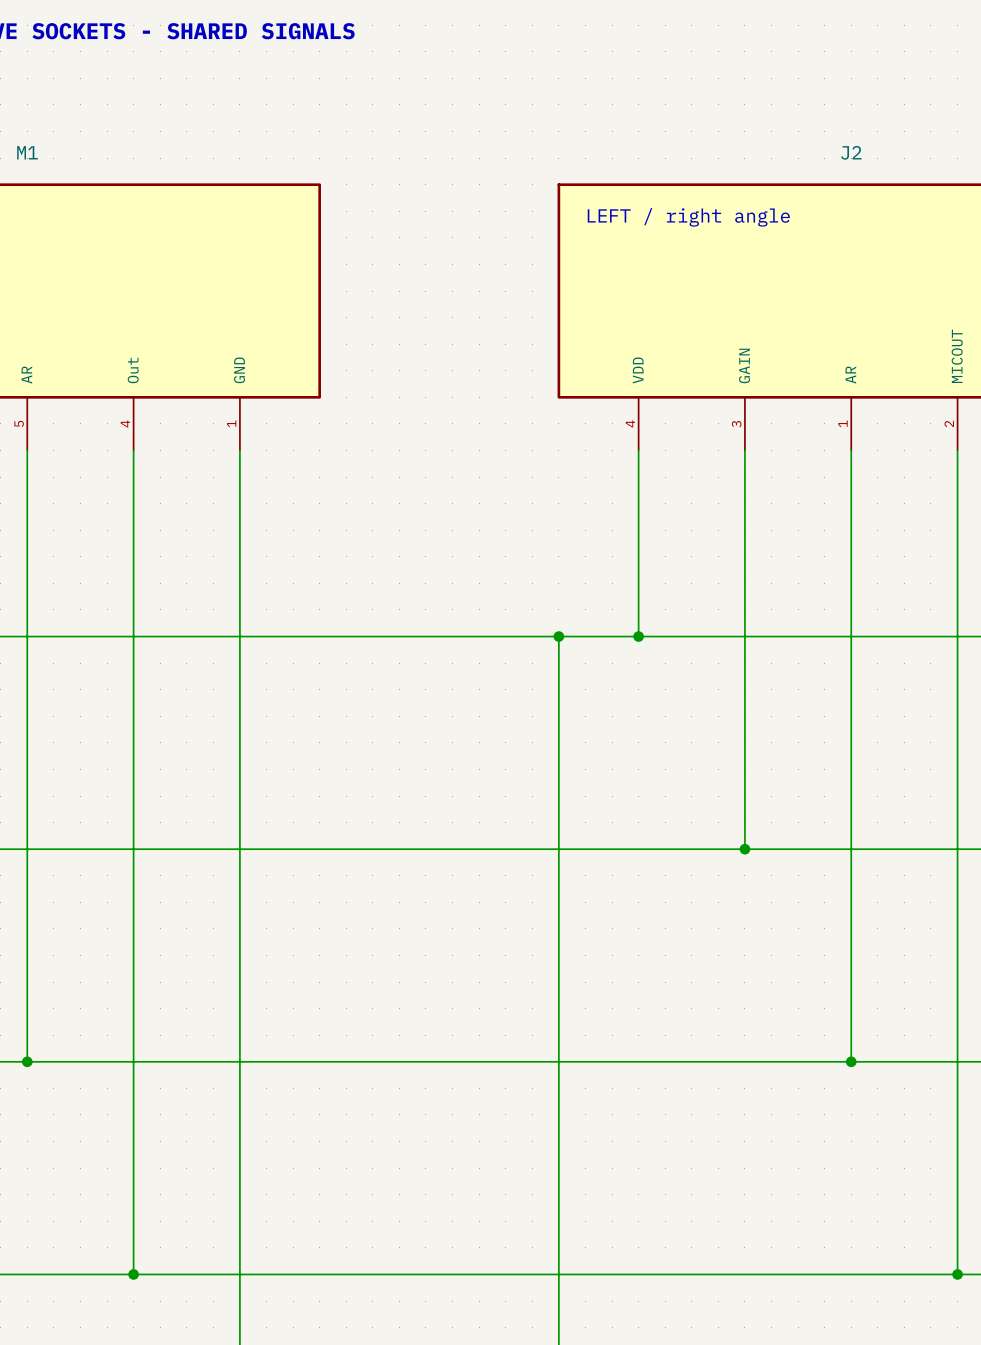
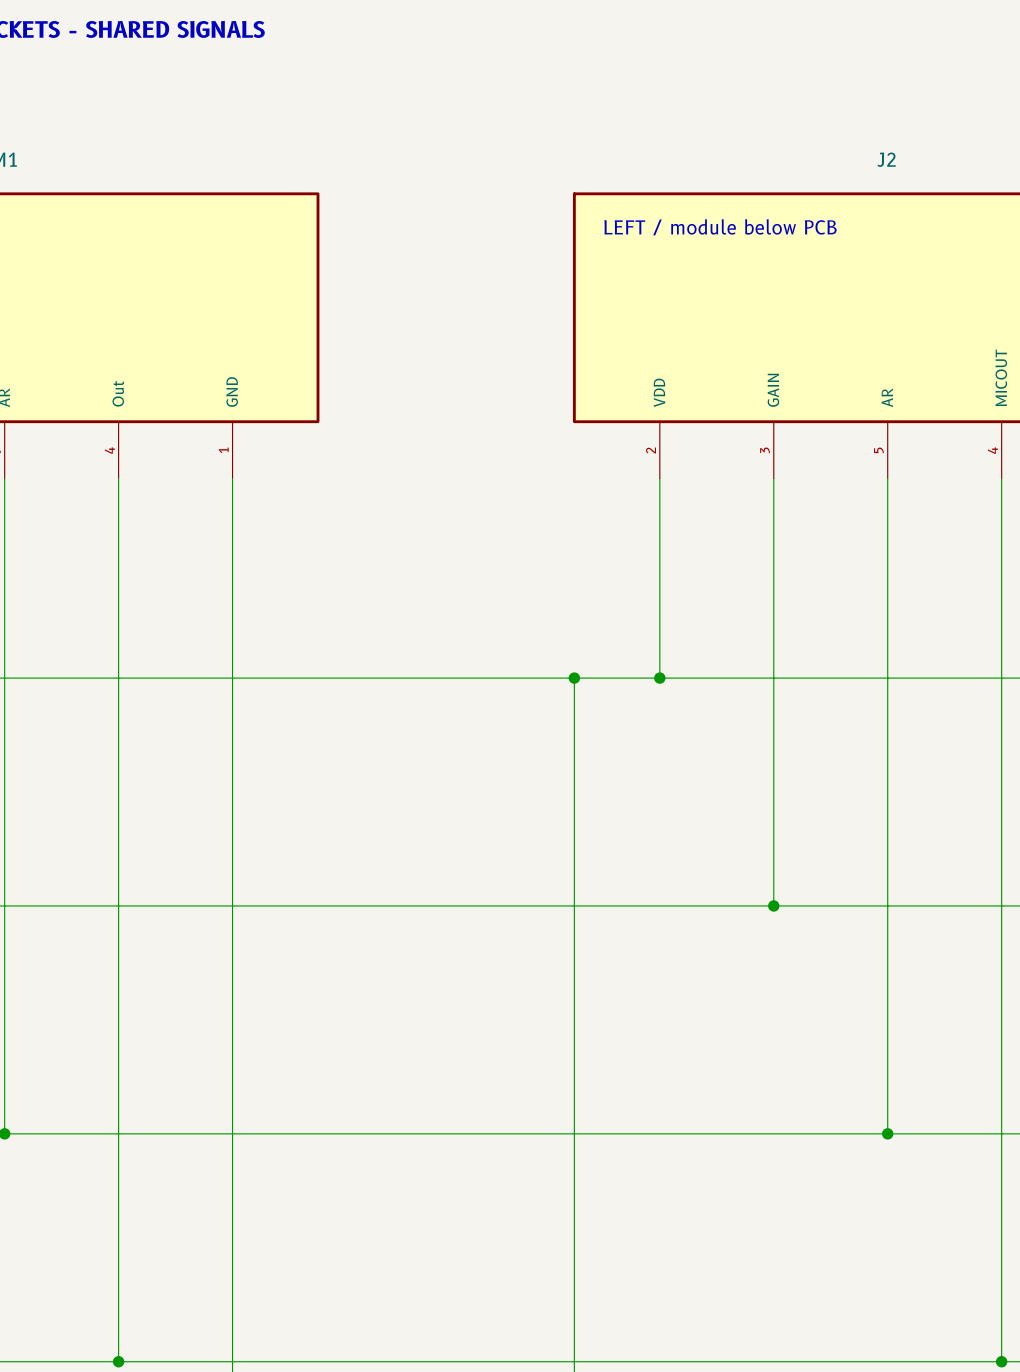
text: LEFT / right angle (688, 217) -> LEFT / module below PCB (720, 227)
J2 pin number: 4 (630, 423) -> 2 (651, 450)
J2 pin number: 1 (843, 423) -> 5 (878, 450)
J2 pin number: 2 (949, 423) -> 4 (992, 450)

